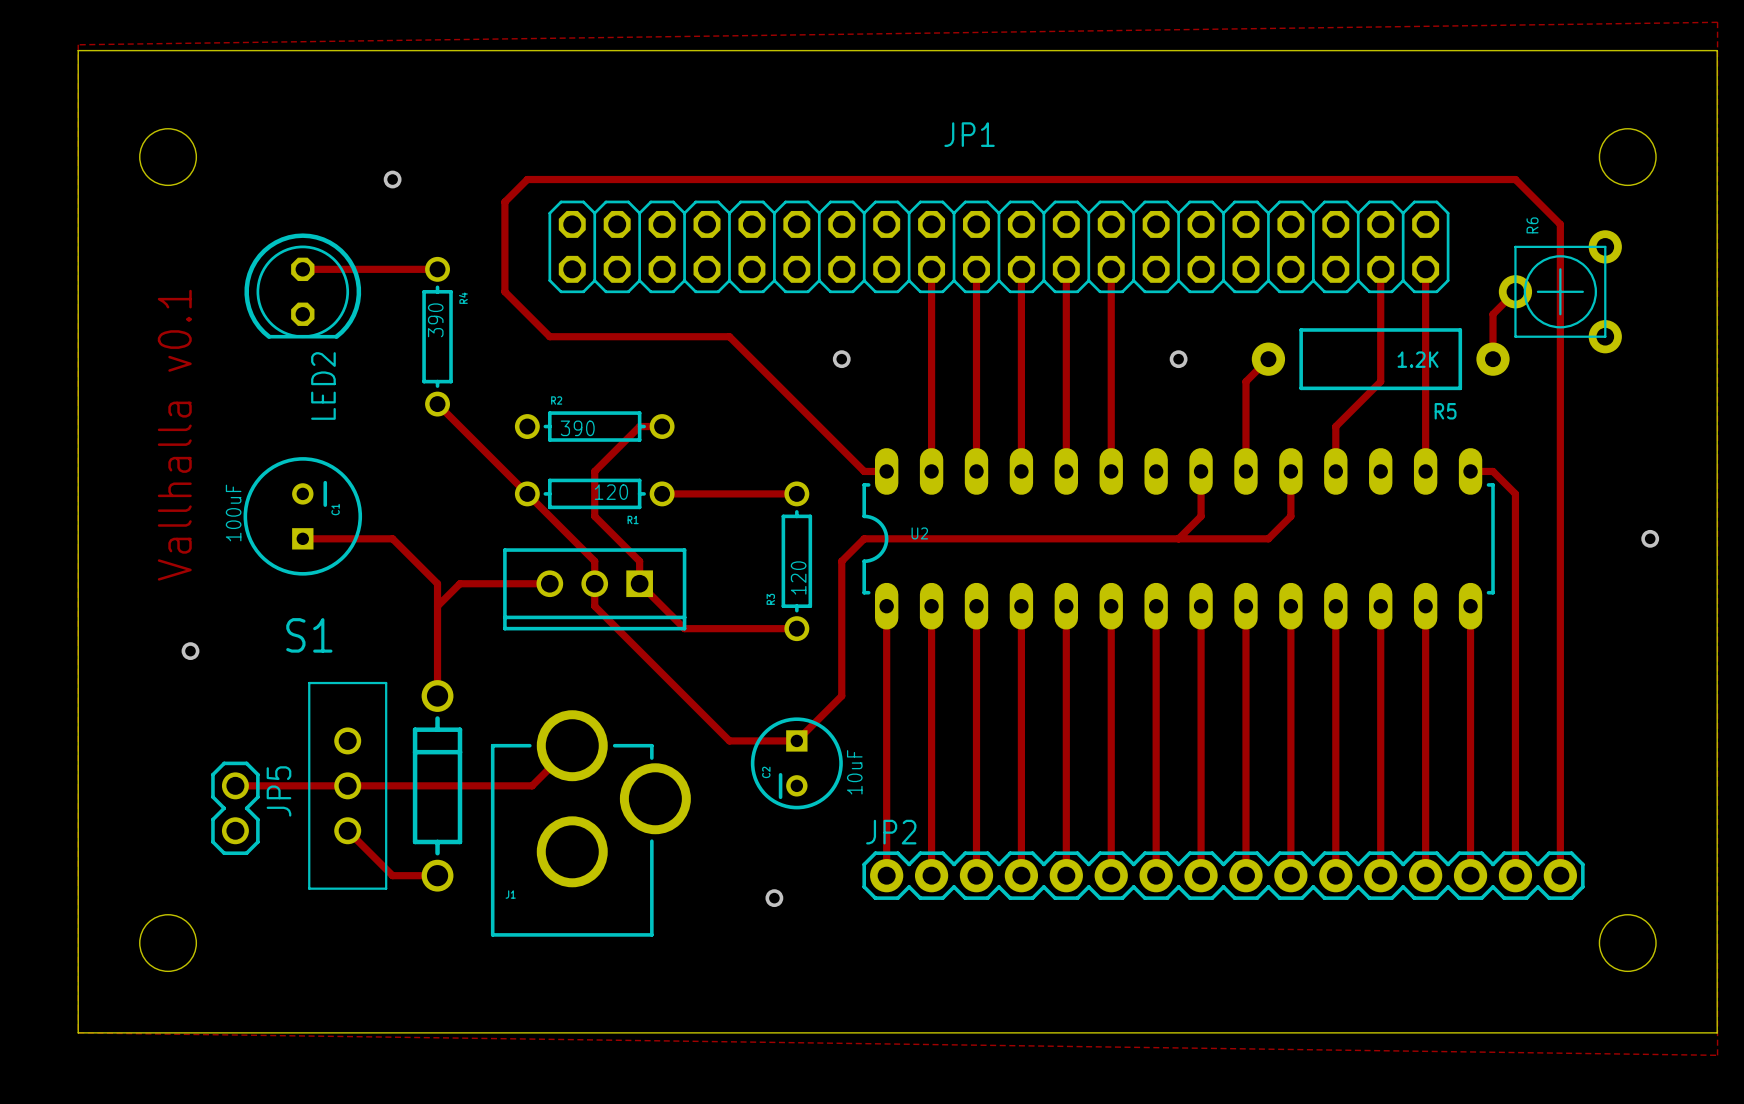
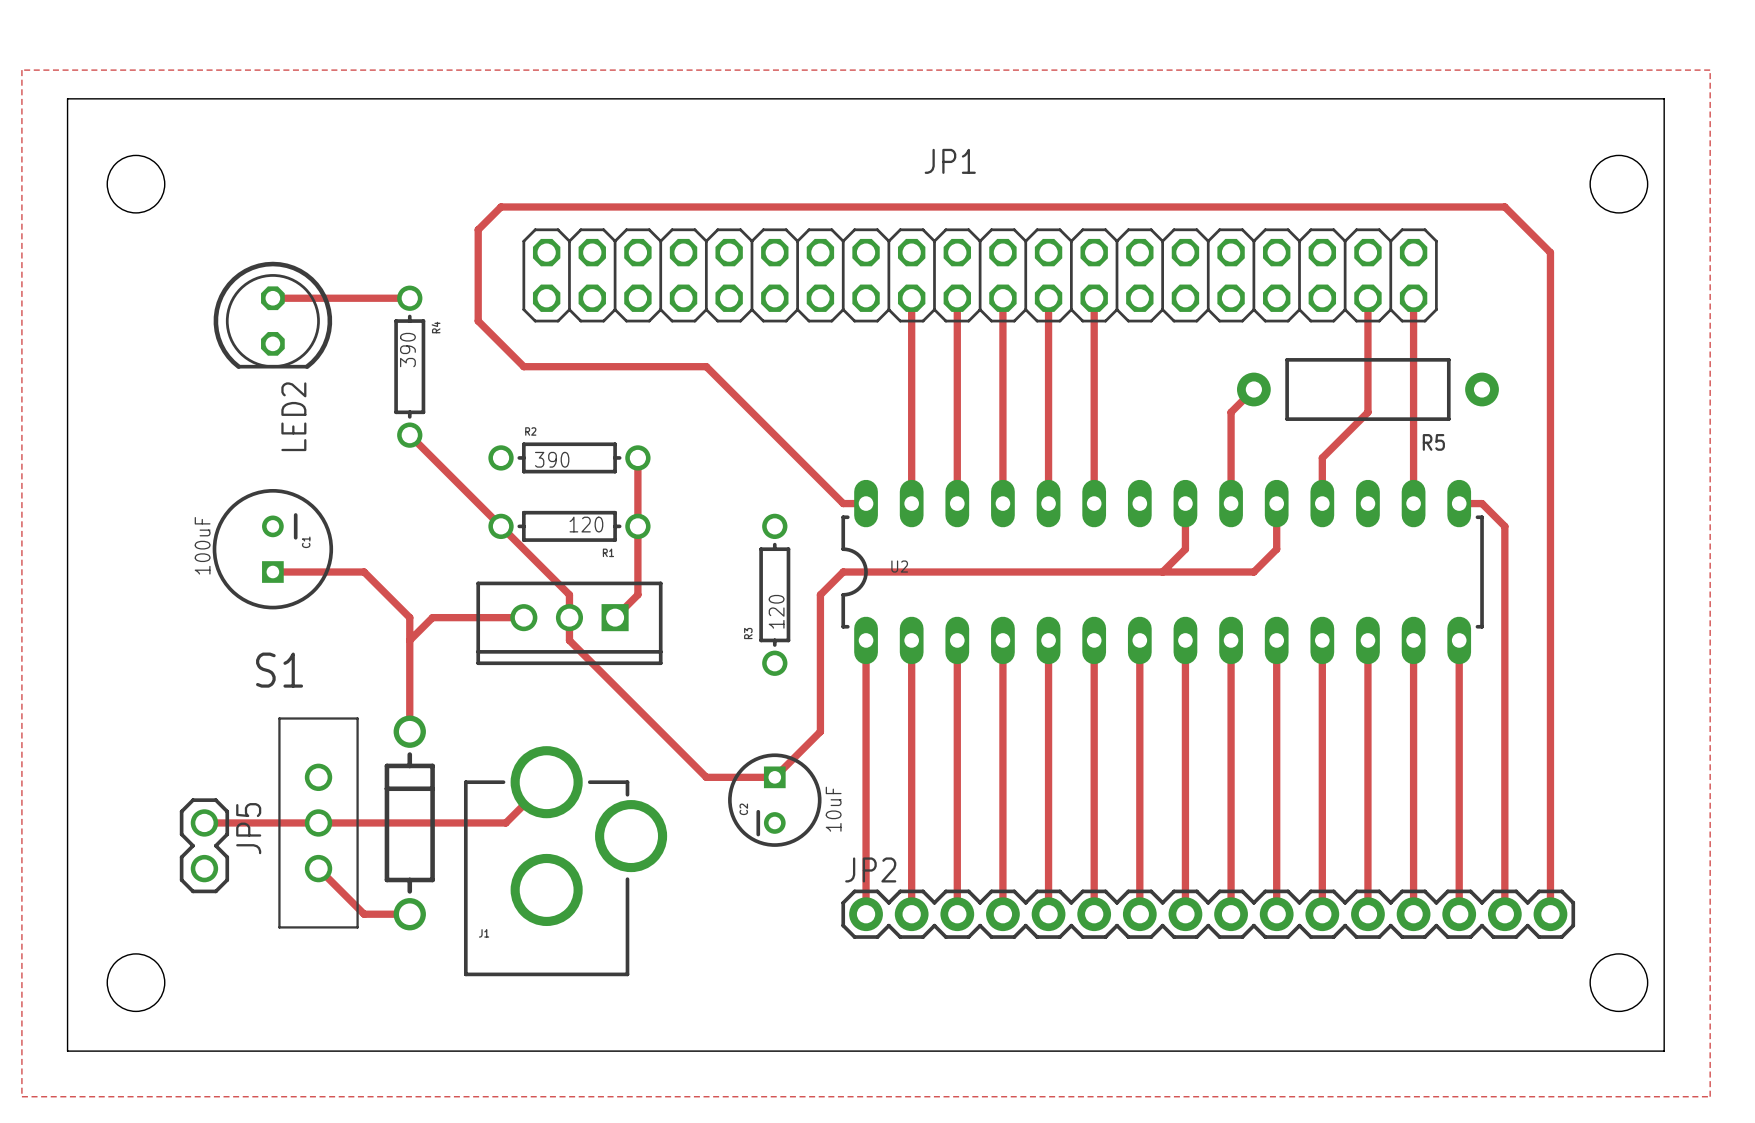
zone outline: (1717, 44) (1717, 22) (78, 44) (78, 1032) (1717, 1055) -> (1710, 70) (21, 70) (21, 1096) (1710, 1096)
board edge: (78, 50) (1717, 50) (1717, 1032) (78, 1032) (78, 50) -> (67, 98) (67, 1051) (1664, 1051) (1664, 98) (67, 98)
via: (392, 179) -> none
track: (1515, 291) (1493, 314) (1493, 359) -> none
R6: (1560, 291) -> none
via: (841, 359) -> none
via: (1178, 359) -> none
R5 value: 1.2K (1418, 359) -> none
track: (662, 426) (639, 426) (594, 471) (594, 516) (639, 561) (639, 583) (684, 628) (796, 628) -> (637, 457) (637, 594) (615, 617)
text: Vallhalla v0.1 (174, 435) -> none
track: (662, 493) (796, 493) -> none
via: (1650, 538) -> none
via: (190, 651) -> none
via: (774, 898) -> none

